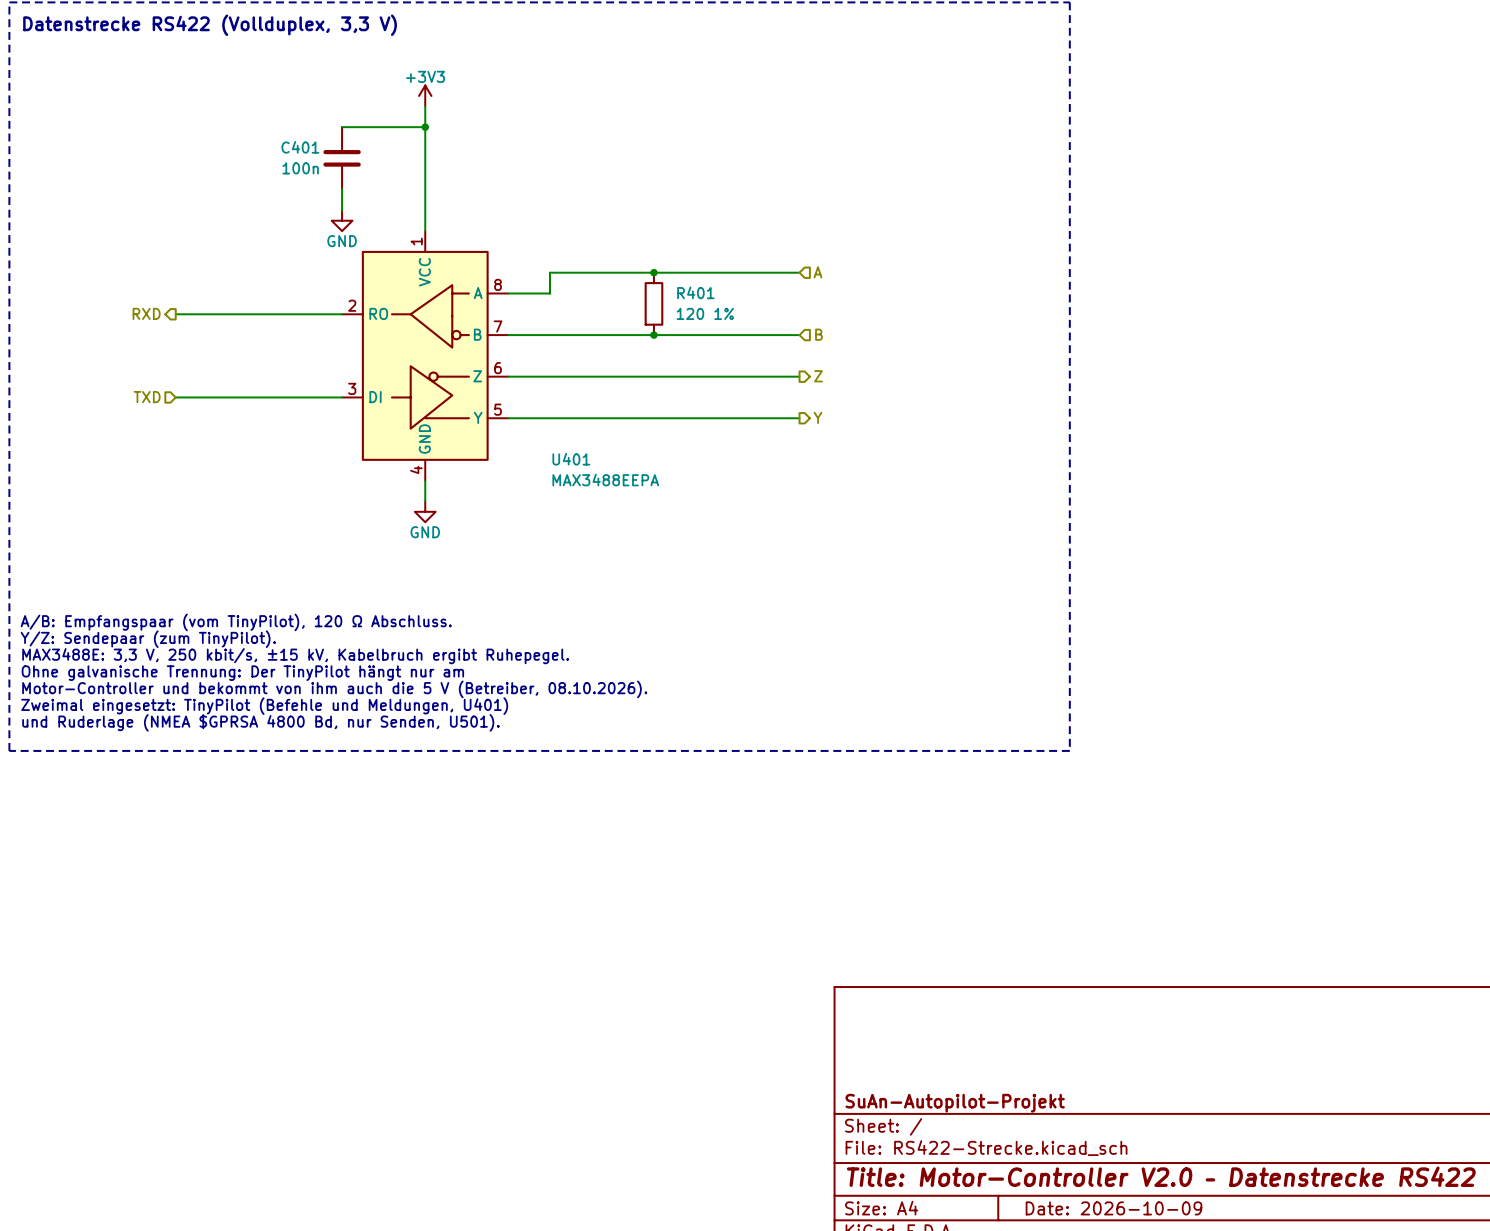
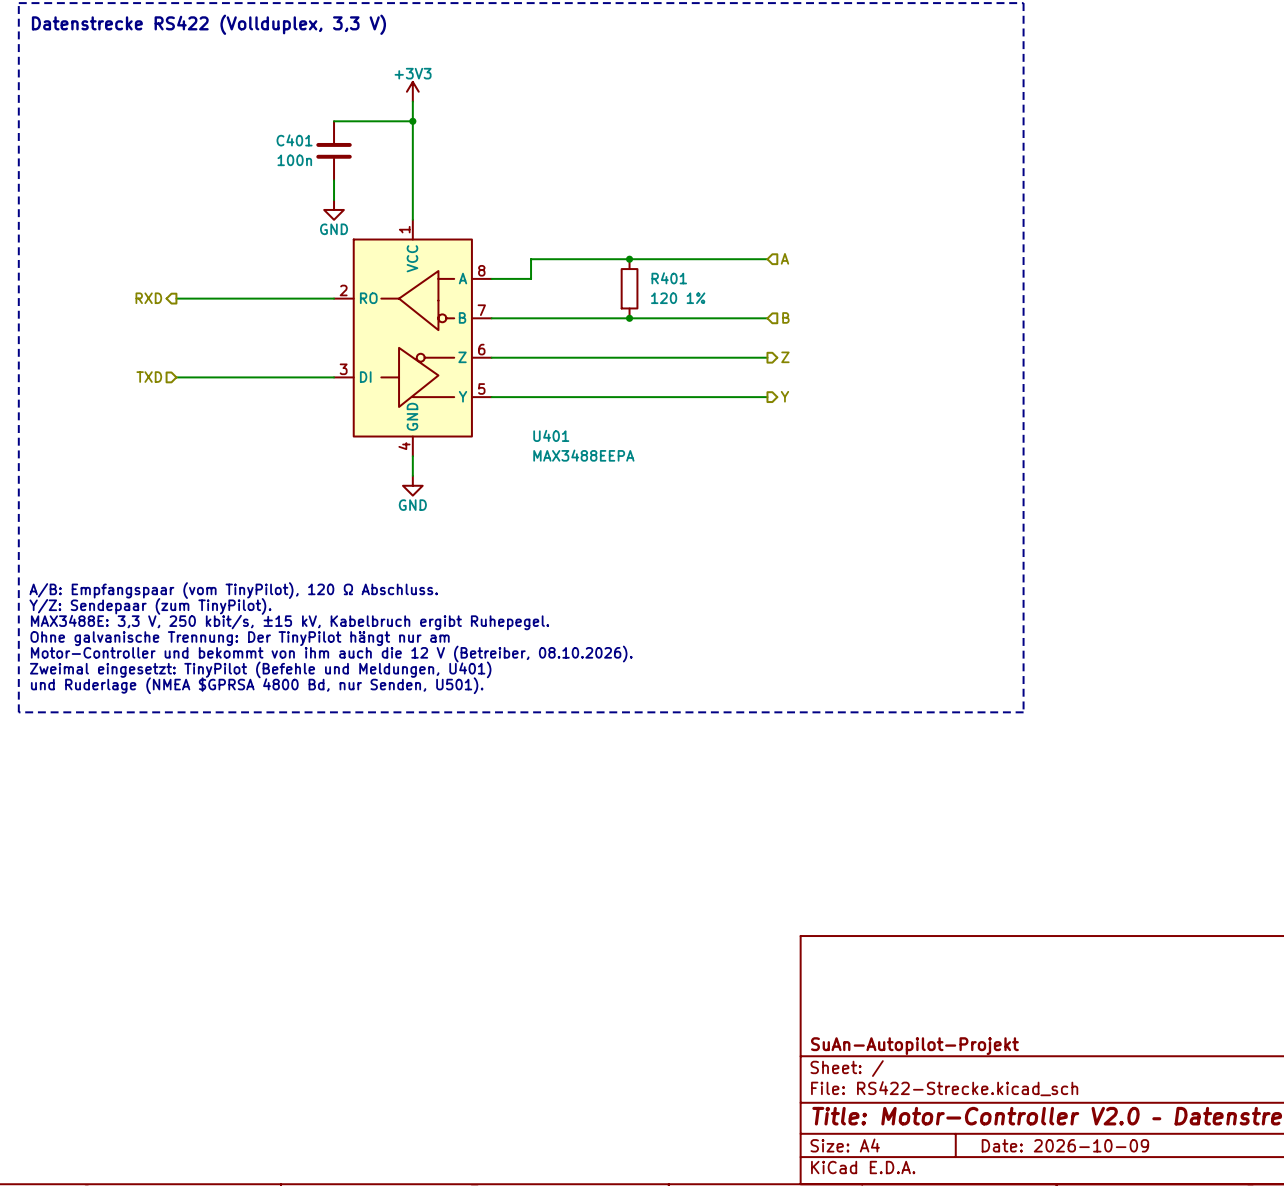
text: Motor-Controller und bekommt von ihm auch die 5 V (Betreiber, 08.10.2026). (334, 689) -> Motor-Controller und bekommt von ihm auch die 12 V (Betreiber, 08.10.2026). (331, 654)

